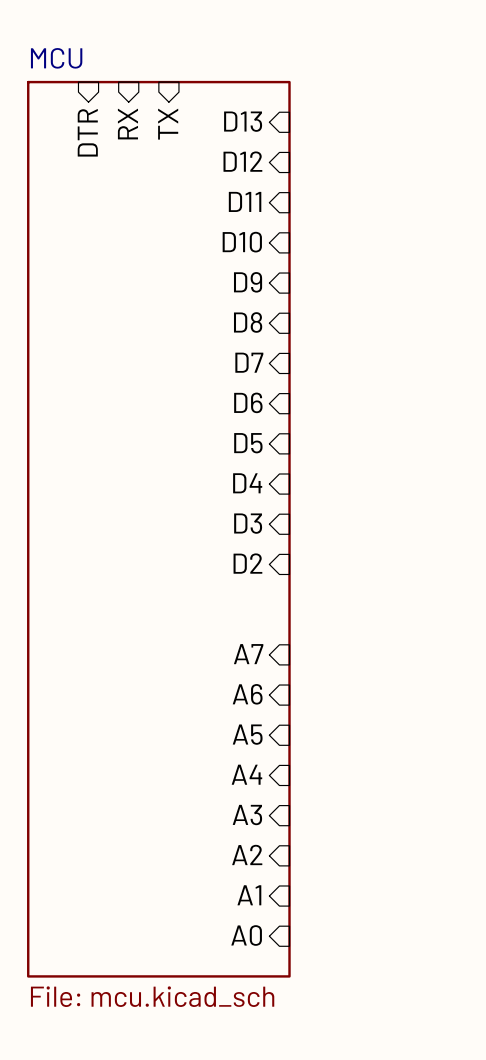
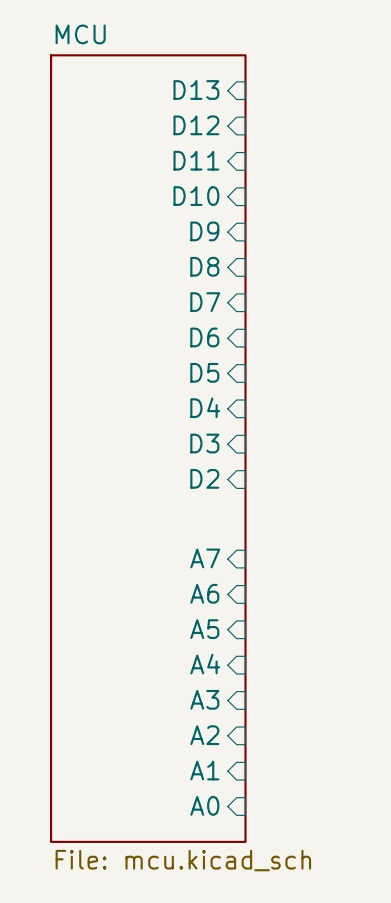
sheet pin: RX (127, 124) -> none
sheet pin: TX (168, 124) -> none
sheet pin: DTR (87, 132) -> none
sheet MCU: File: mcu.kicad_sch (158, 529) -> none
sheet MCU: none -> File: mcu.kicad_sch (148, 448)

